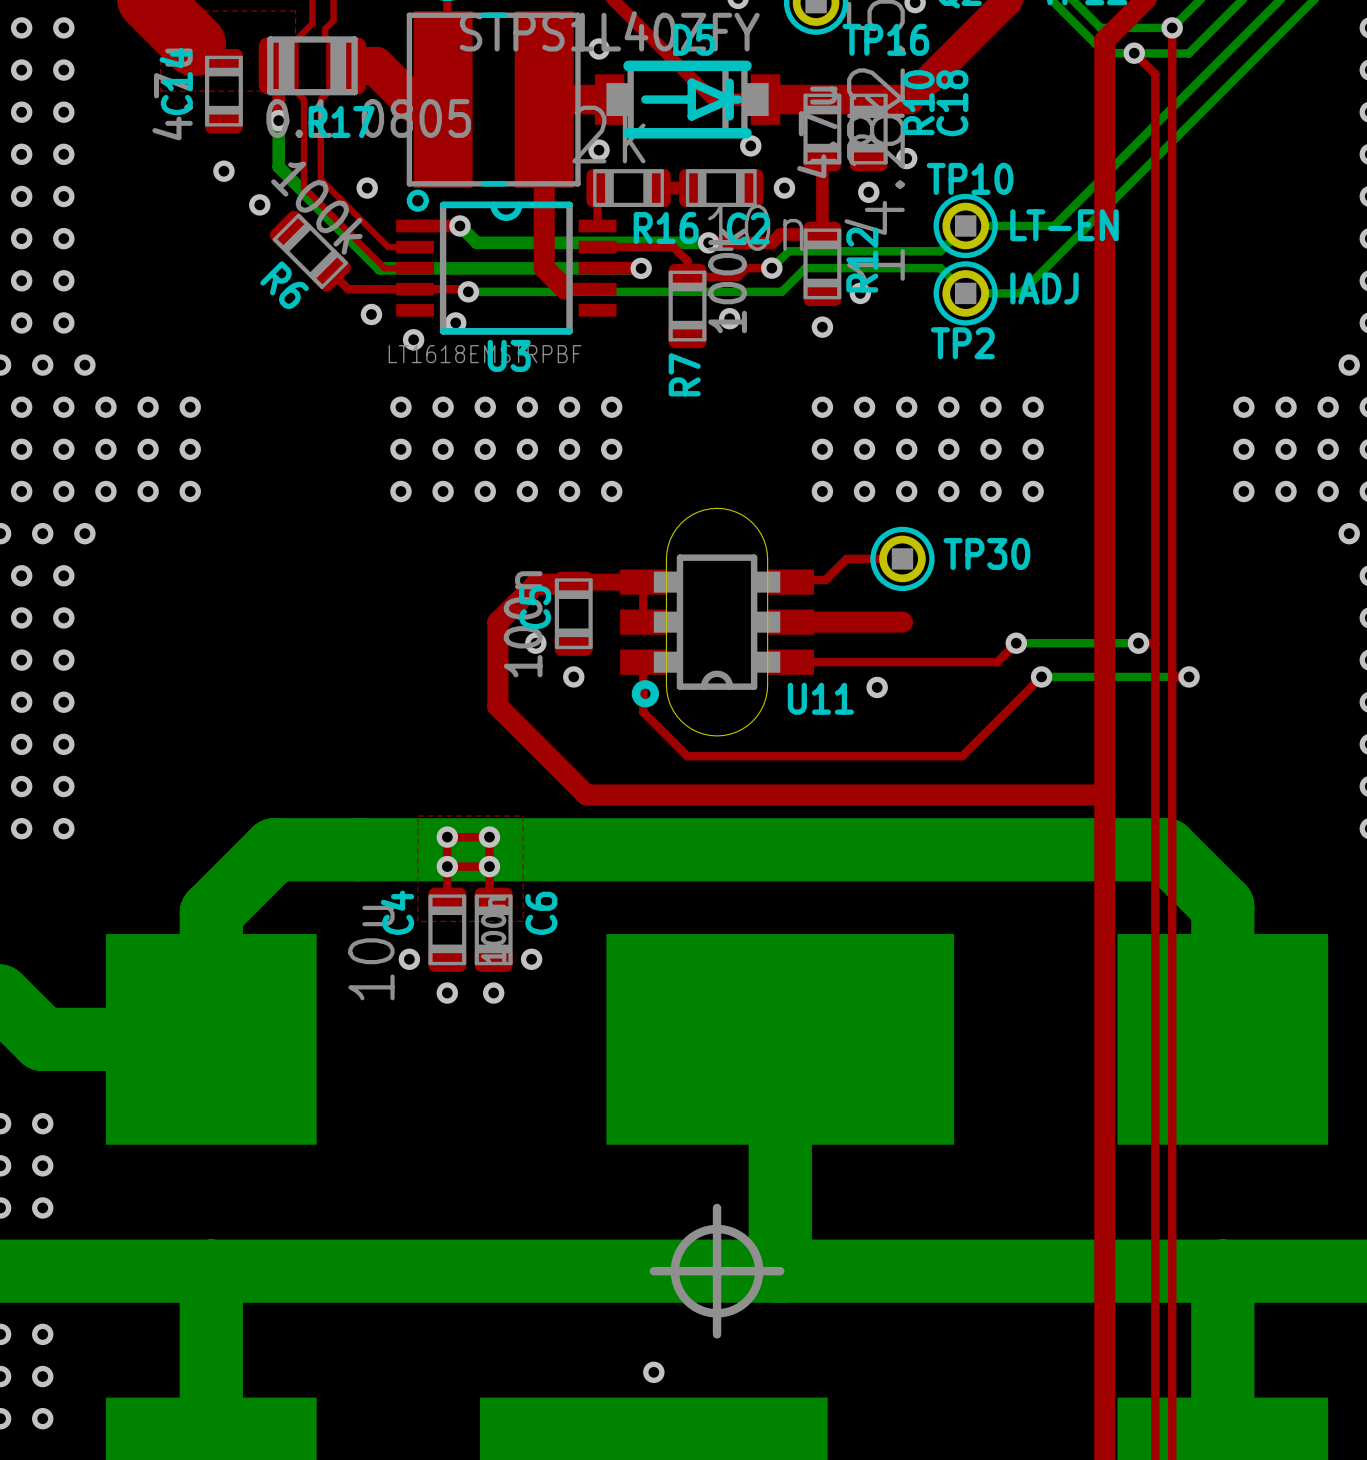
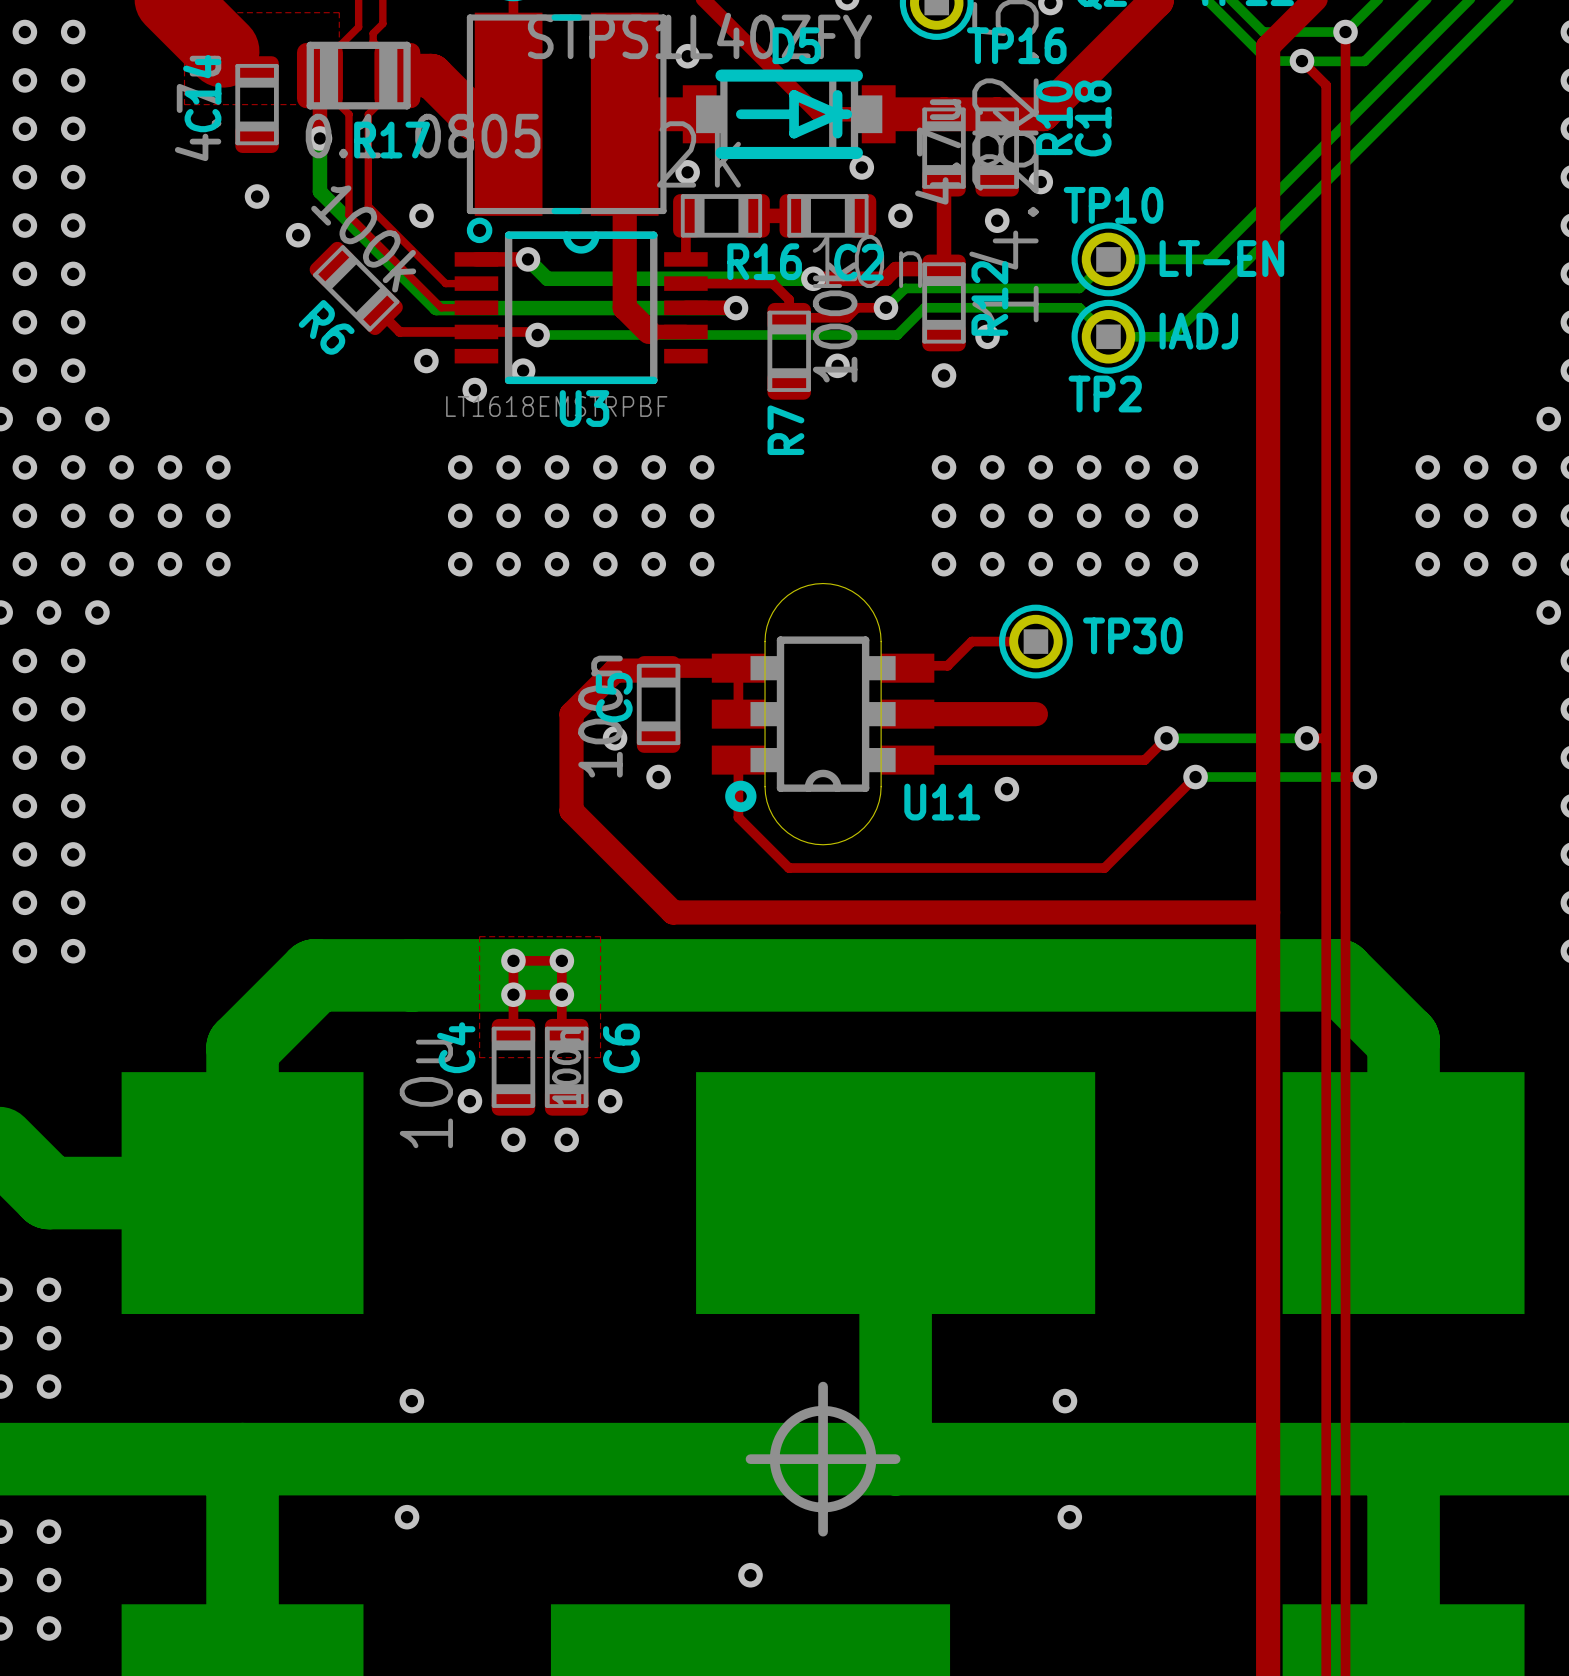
via: none -> (411, 1401)
via: none -> (1064, 1401)
via: none -> (407, 1517)
via: none -> (1069, 1517)

